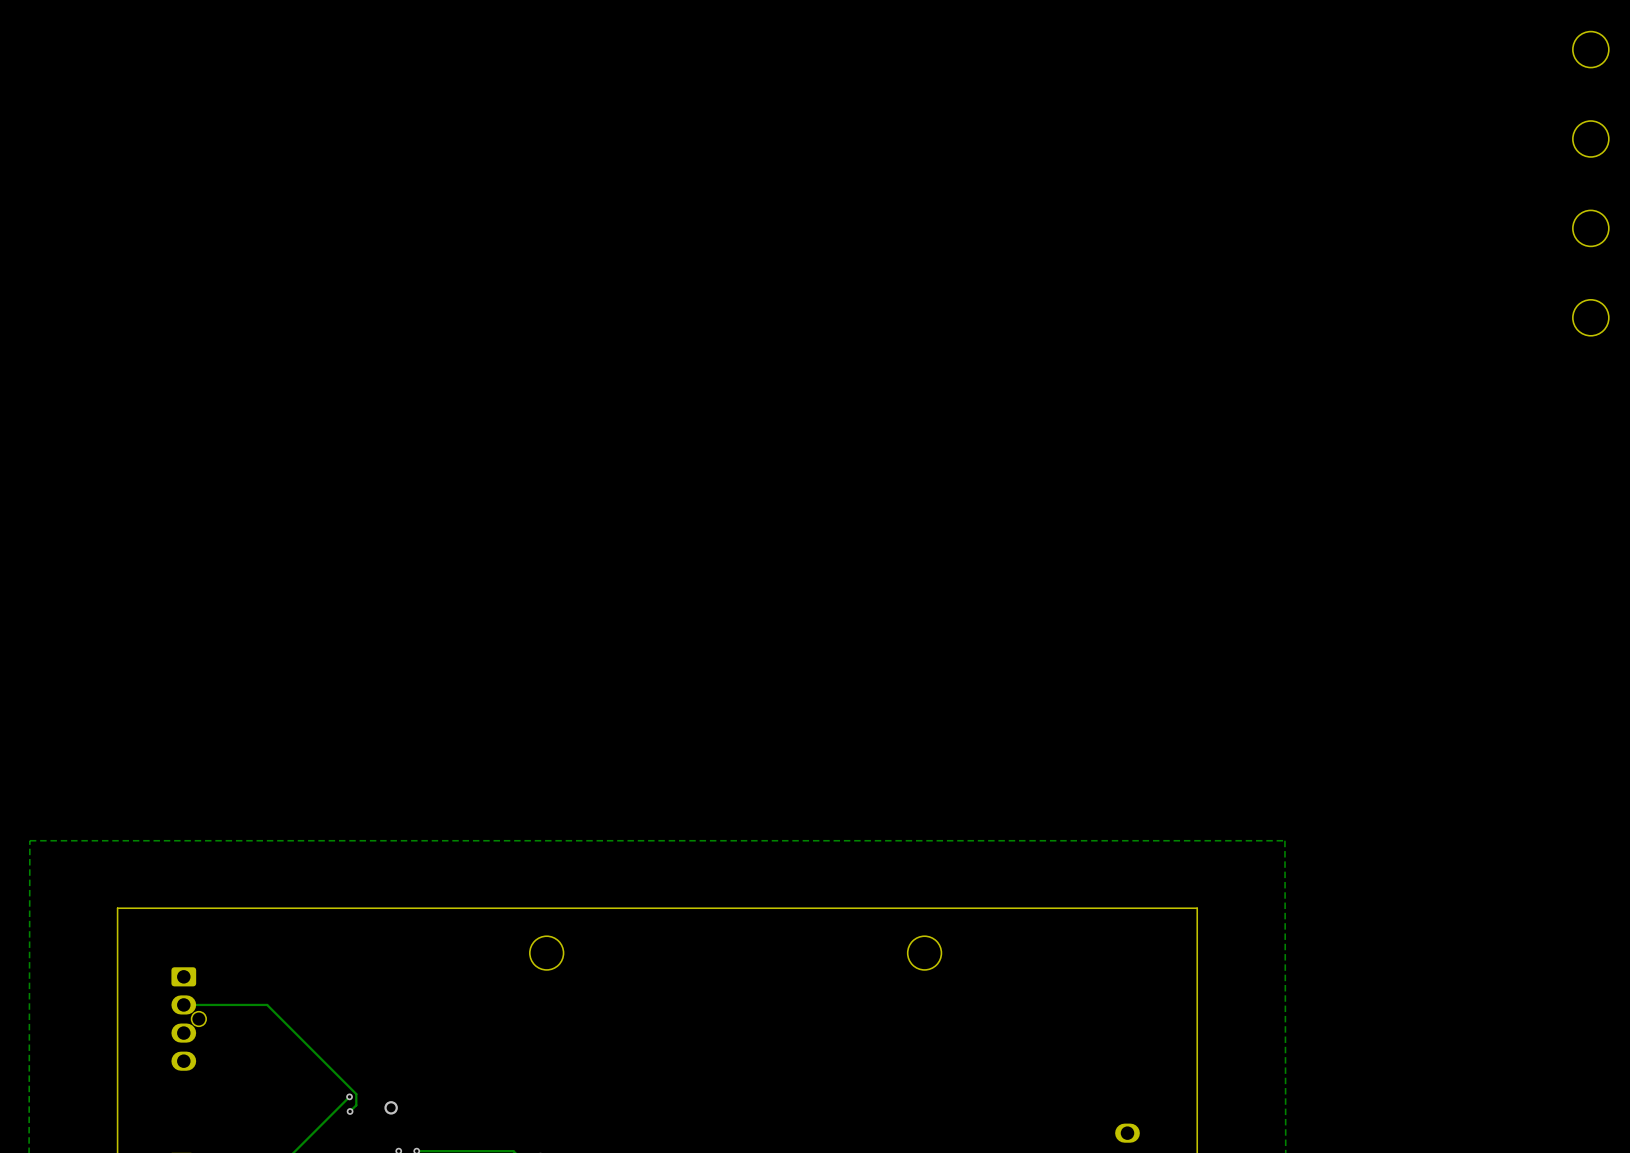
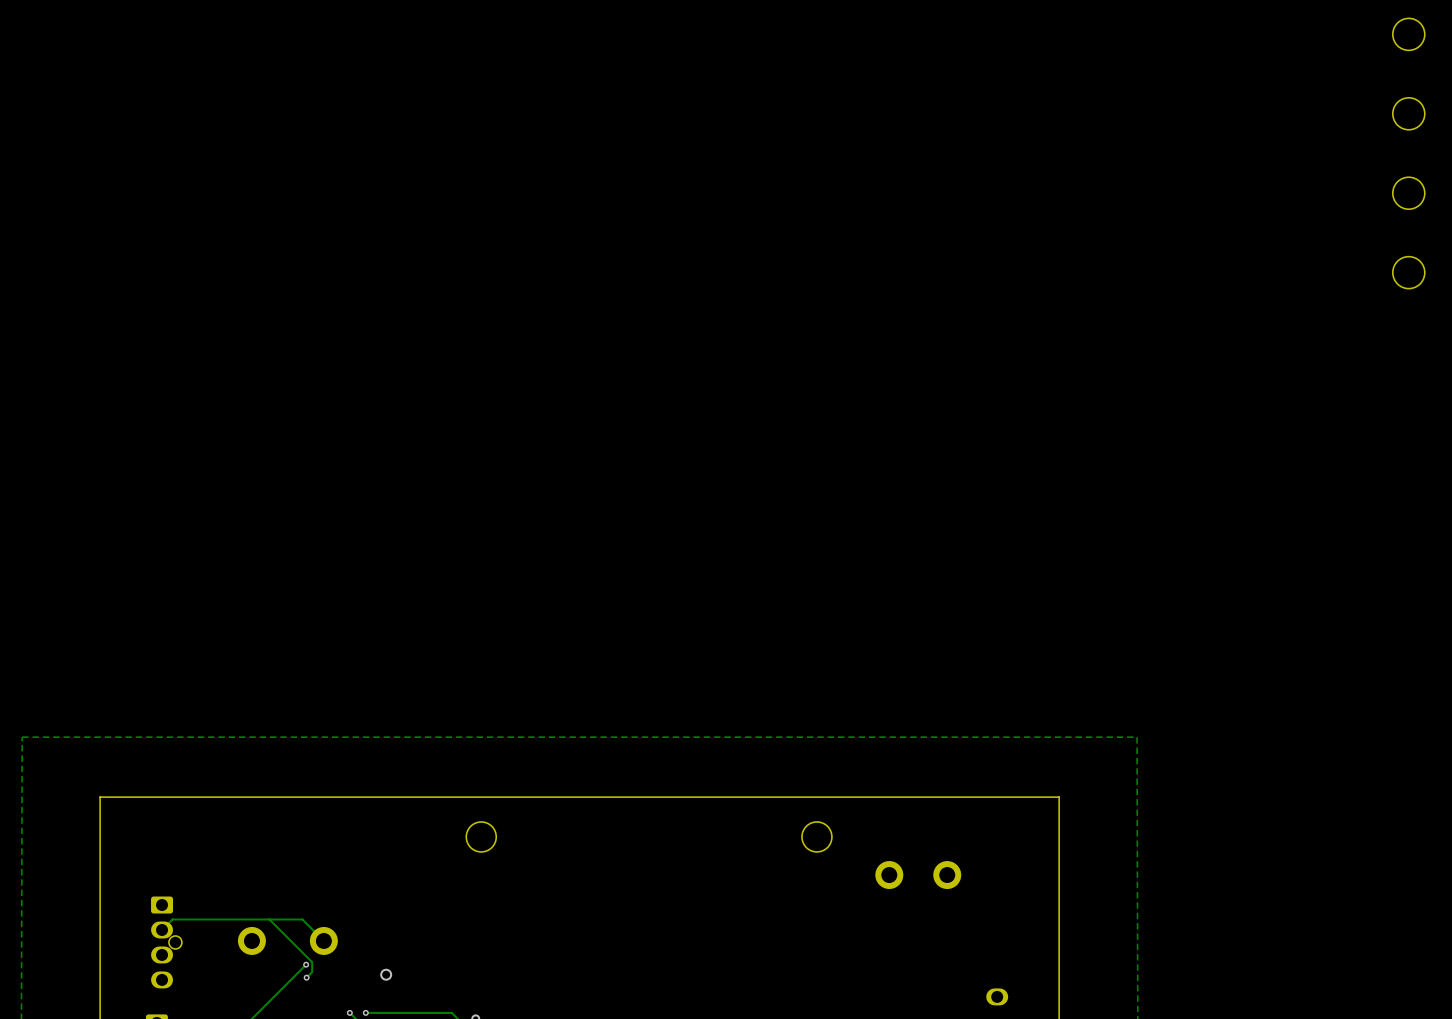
part: none -> (889, 875)
part: none -> (947, 875)
track: (183, 1004) (267, 1004) (308, 1046) -> none
part position: (188, 1019) -> (166, 942)
track: none -> (162, 929) (172, 919) (302, 919) (323, 940)
part: none -> (251, 940)
part: none -> (323, 940)
via position: (391, 1107) -> (386, 974)

